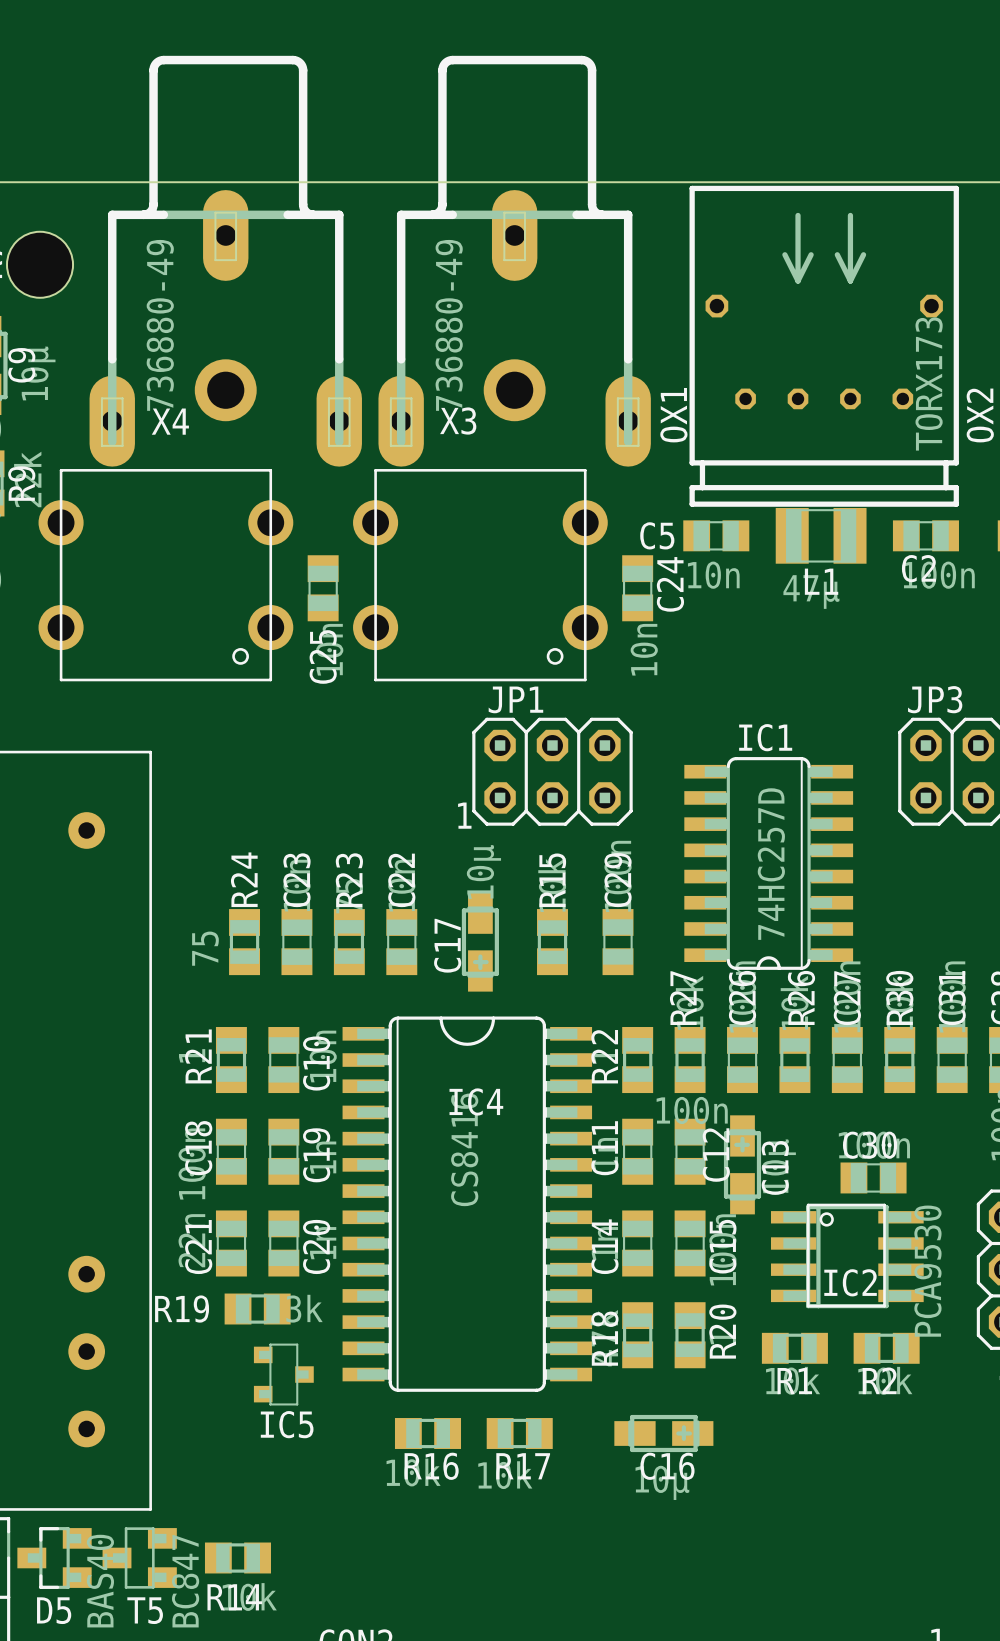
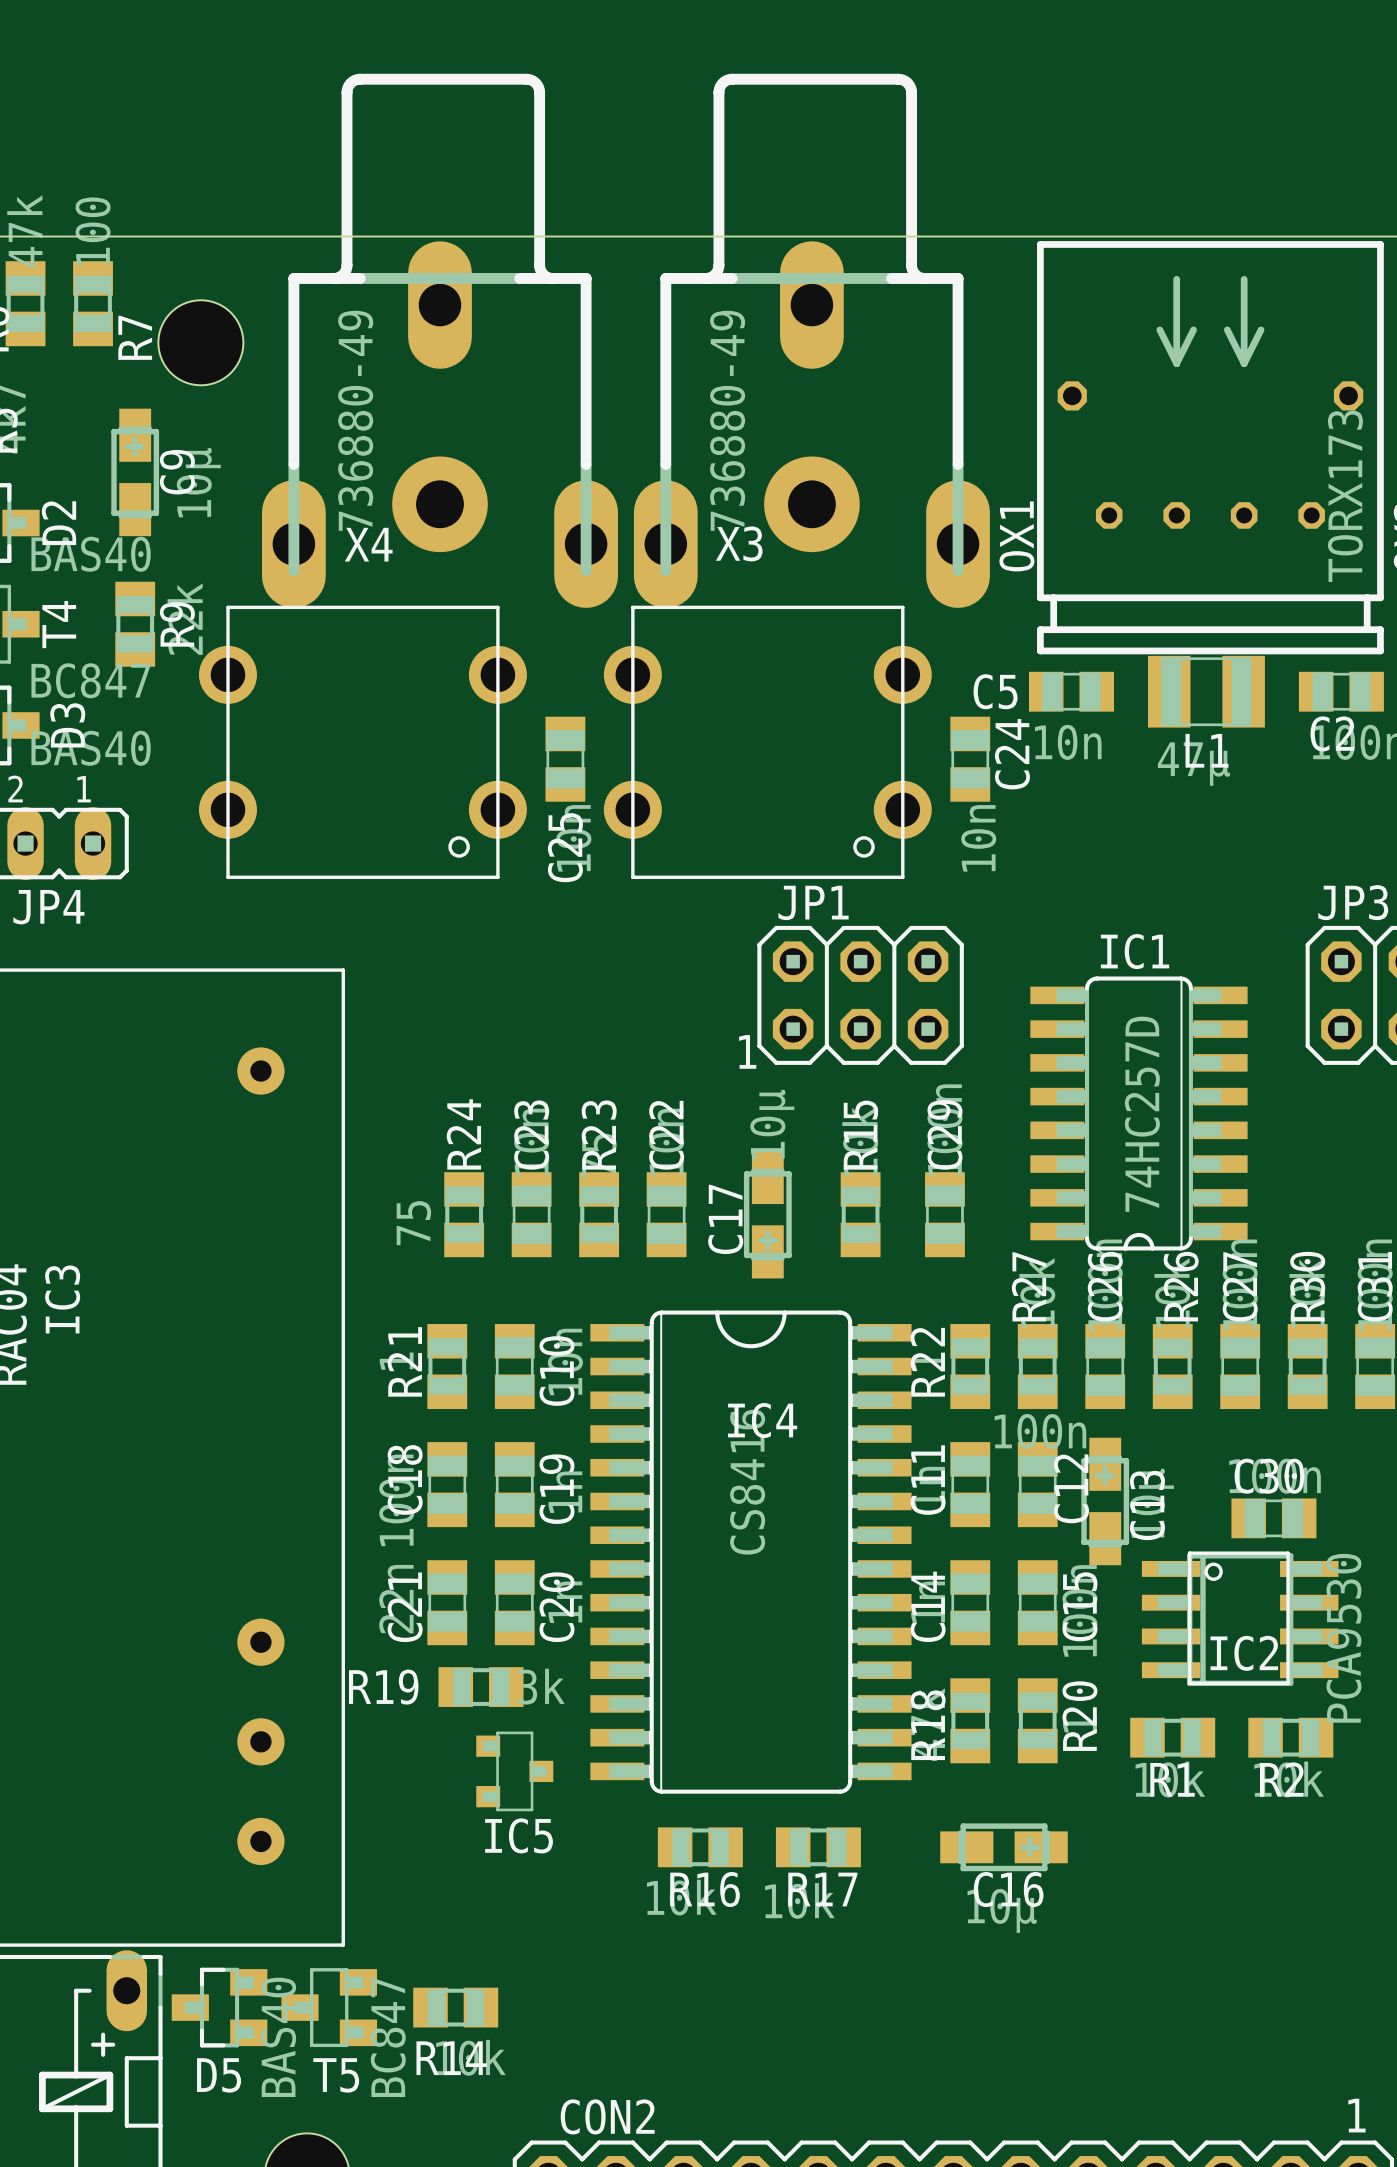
X4 footprint: [89, 55, 362, 467] -> [261, 73, 618, 608]
X3 footprint: [378, 55, 651, 467] -> [633, 73, 990, 608]

